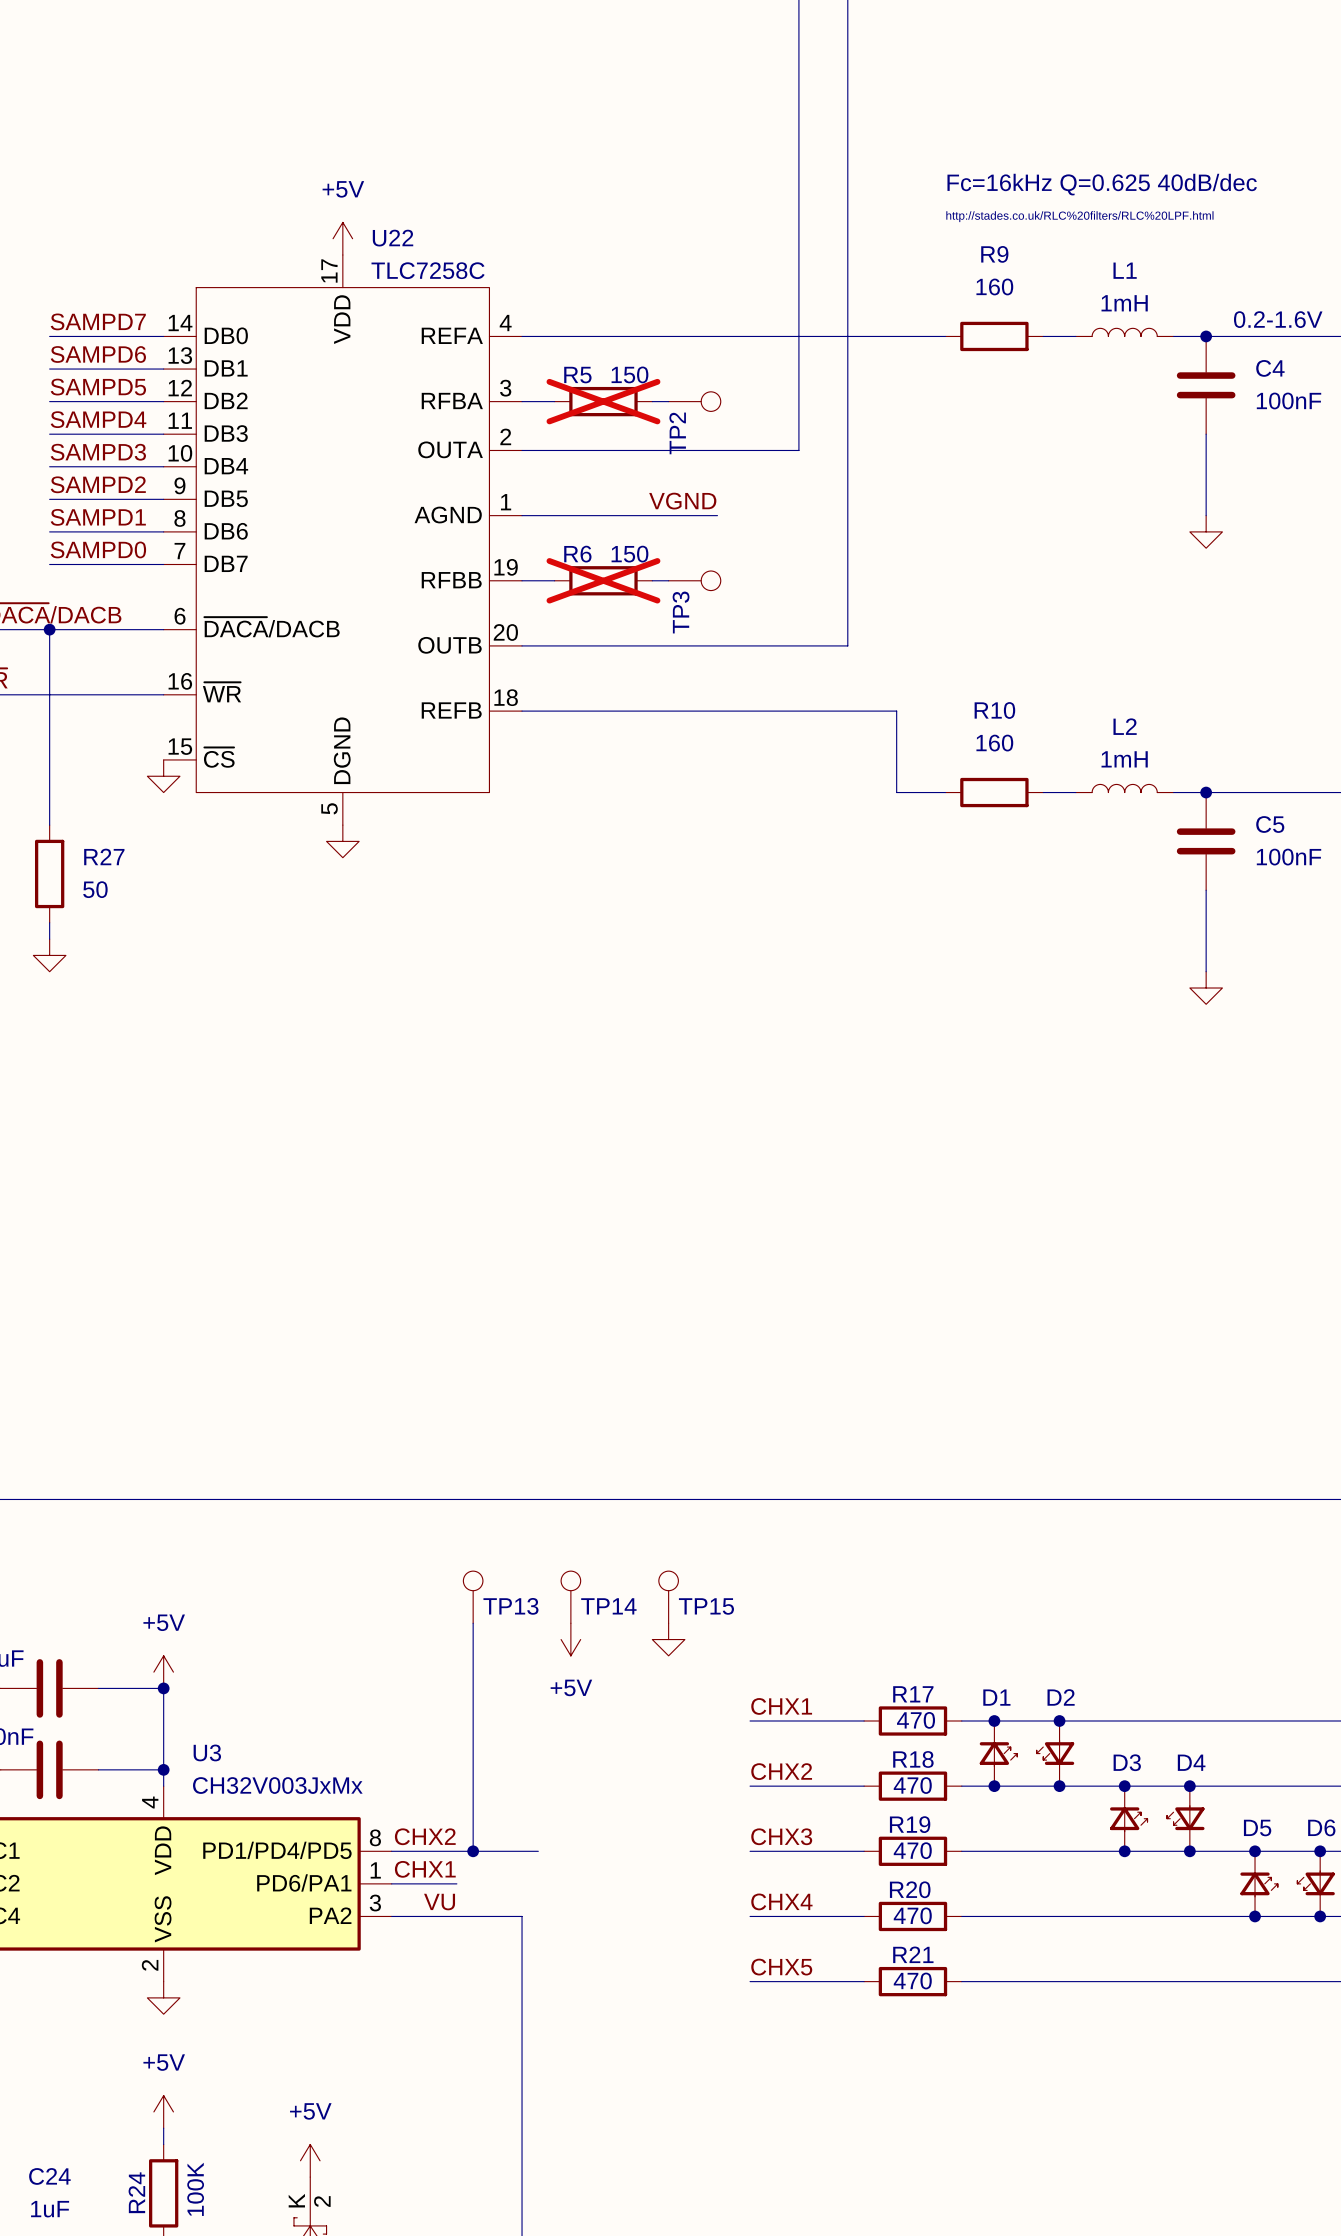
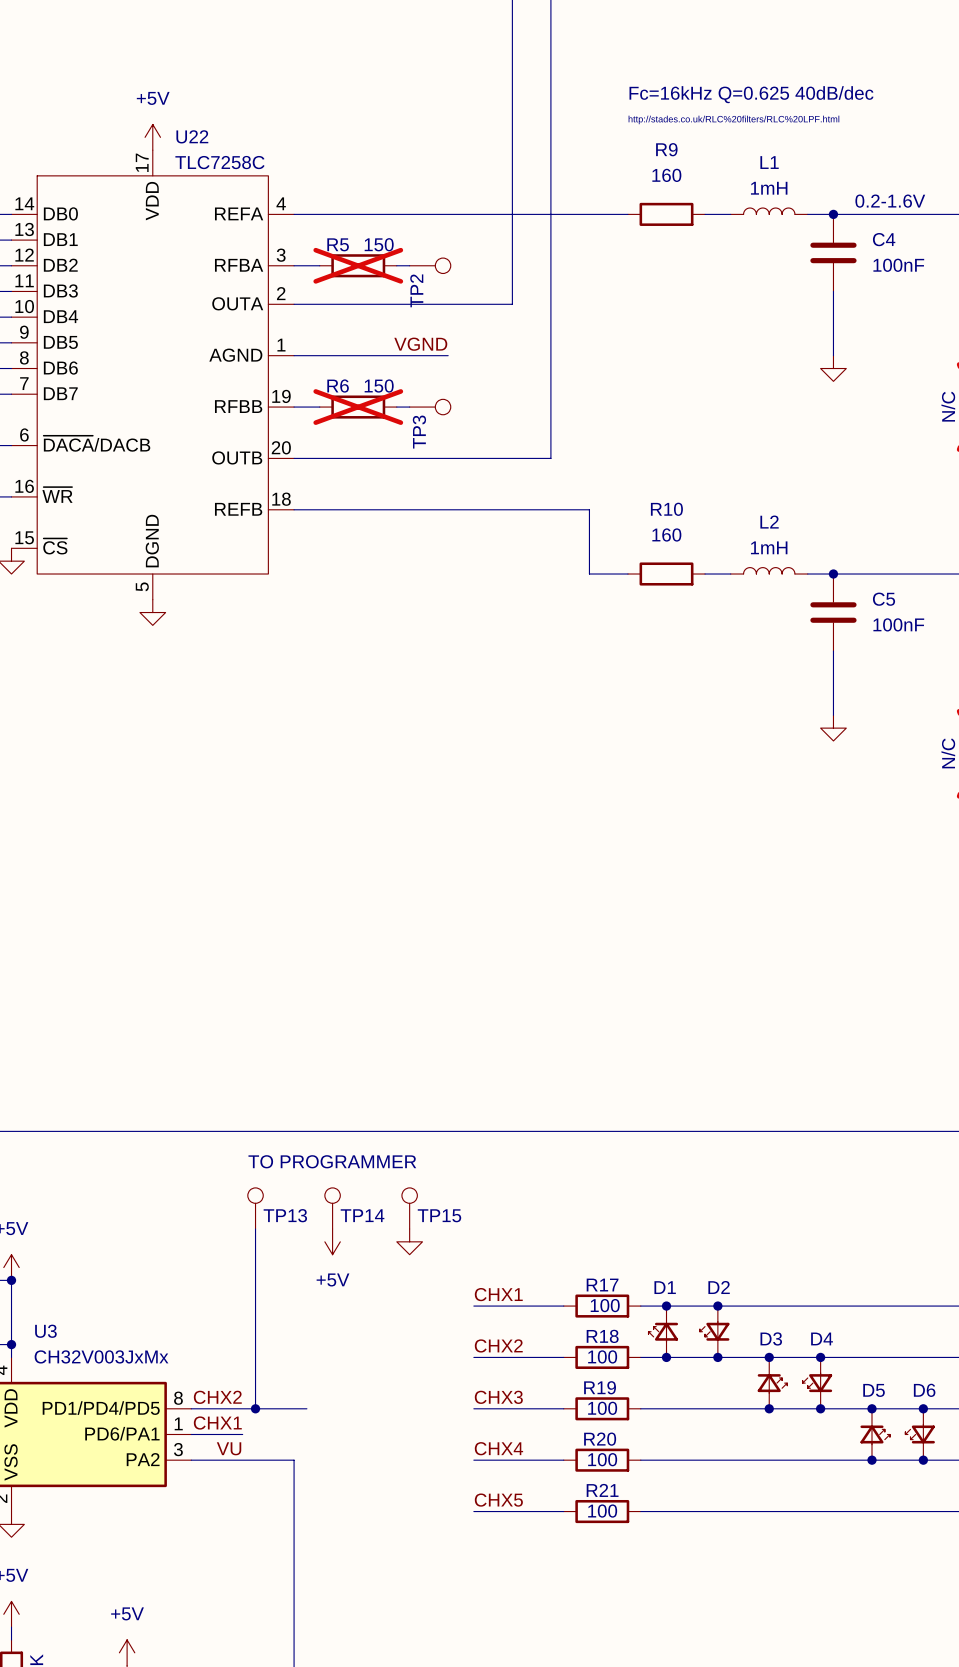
text: none -> TO PROGRAMMER (332, 1161)
R17 value: 470 (916, 1720) -> 100 (605, 1305)
D1 flip: as is (998, 1754) -> left-right (663, 1332)
R18 value: 470 (912, 1785) -> 100 (602, 1356)
R19 value: 470 (912, 1850) -> 100 (602, 1408)
R20 value: 470 (912, 1915) -> 100 (602, 1459)
R21 value: 470 (912, 1981) -> 100 (602, 1511)

